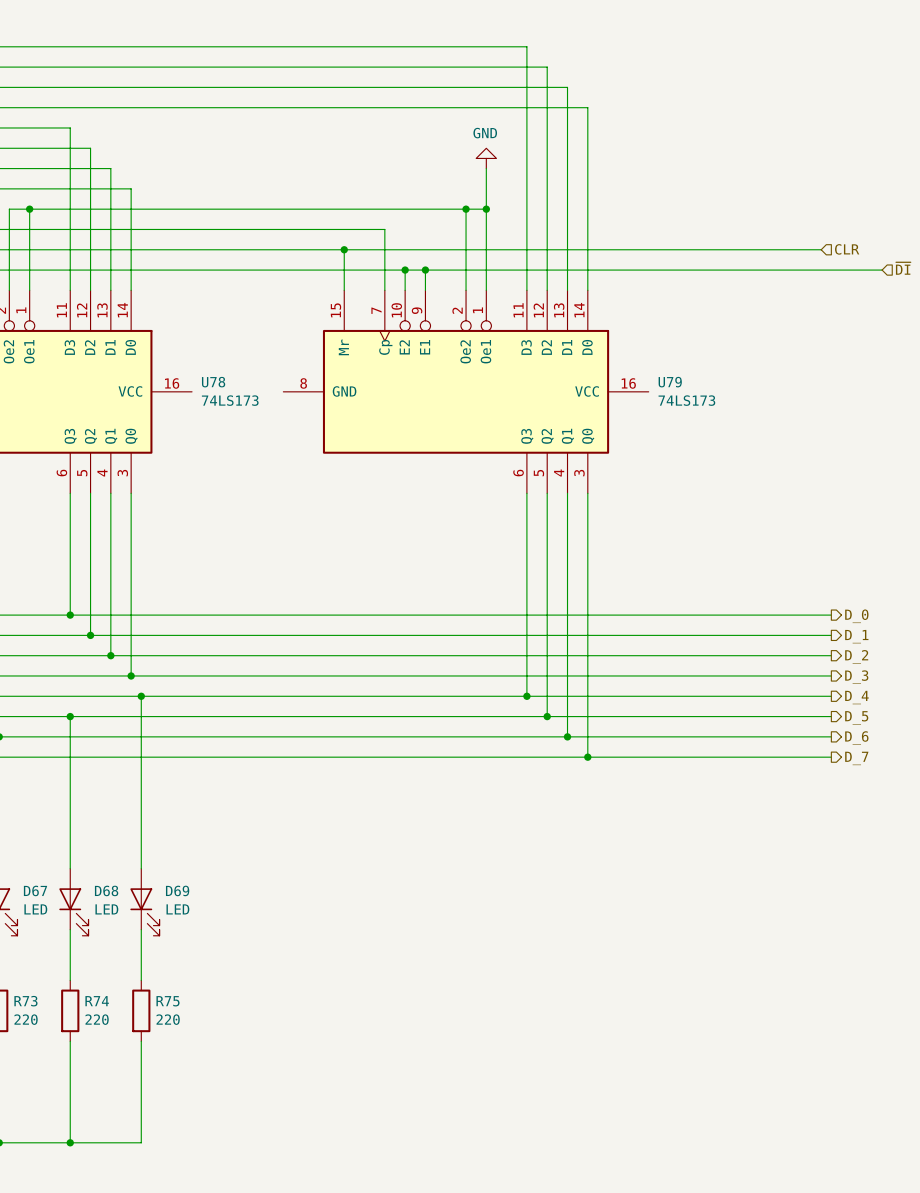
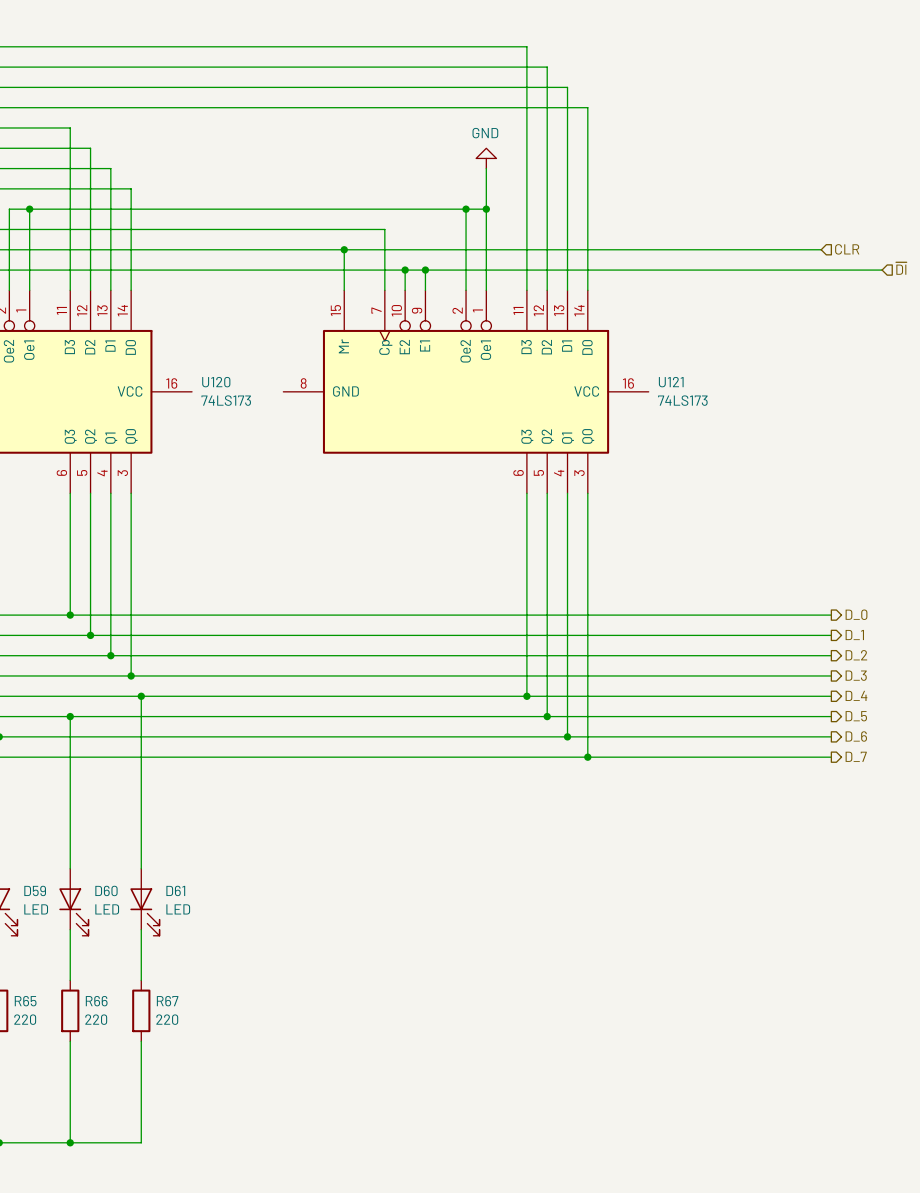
U78 name: U78 (213, 382) -> U120 (216, 382)
U79 name: U79 (670, 382) -> U121 (671, 382)
D67 name: D67 (35, 890) -> D59 (35, 890)
D68 name: D68 (106, 890) -> D60 (106, 890)
D69 name: D69 (177, 890) -> D61 (175, 890)
R73 name: R73 (25, 1001) -> R65 (25, 1001)
R74 name: R74 (97, 1001) -> R66 (96, 1001)
R75 name: R75 (167, 1001) -> R67 (167, 1001)

